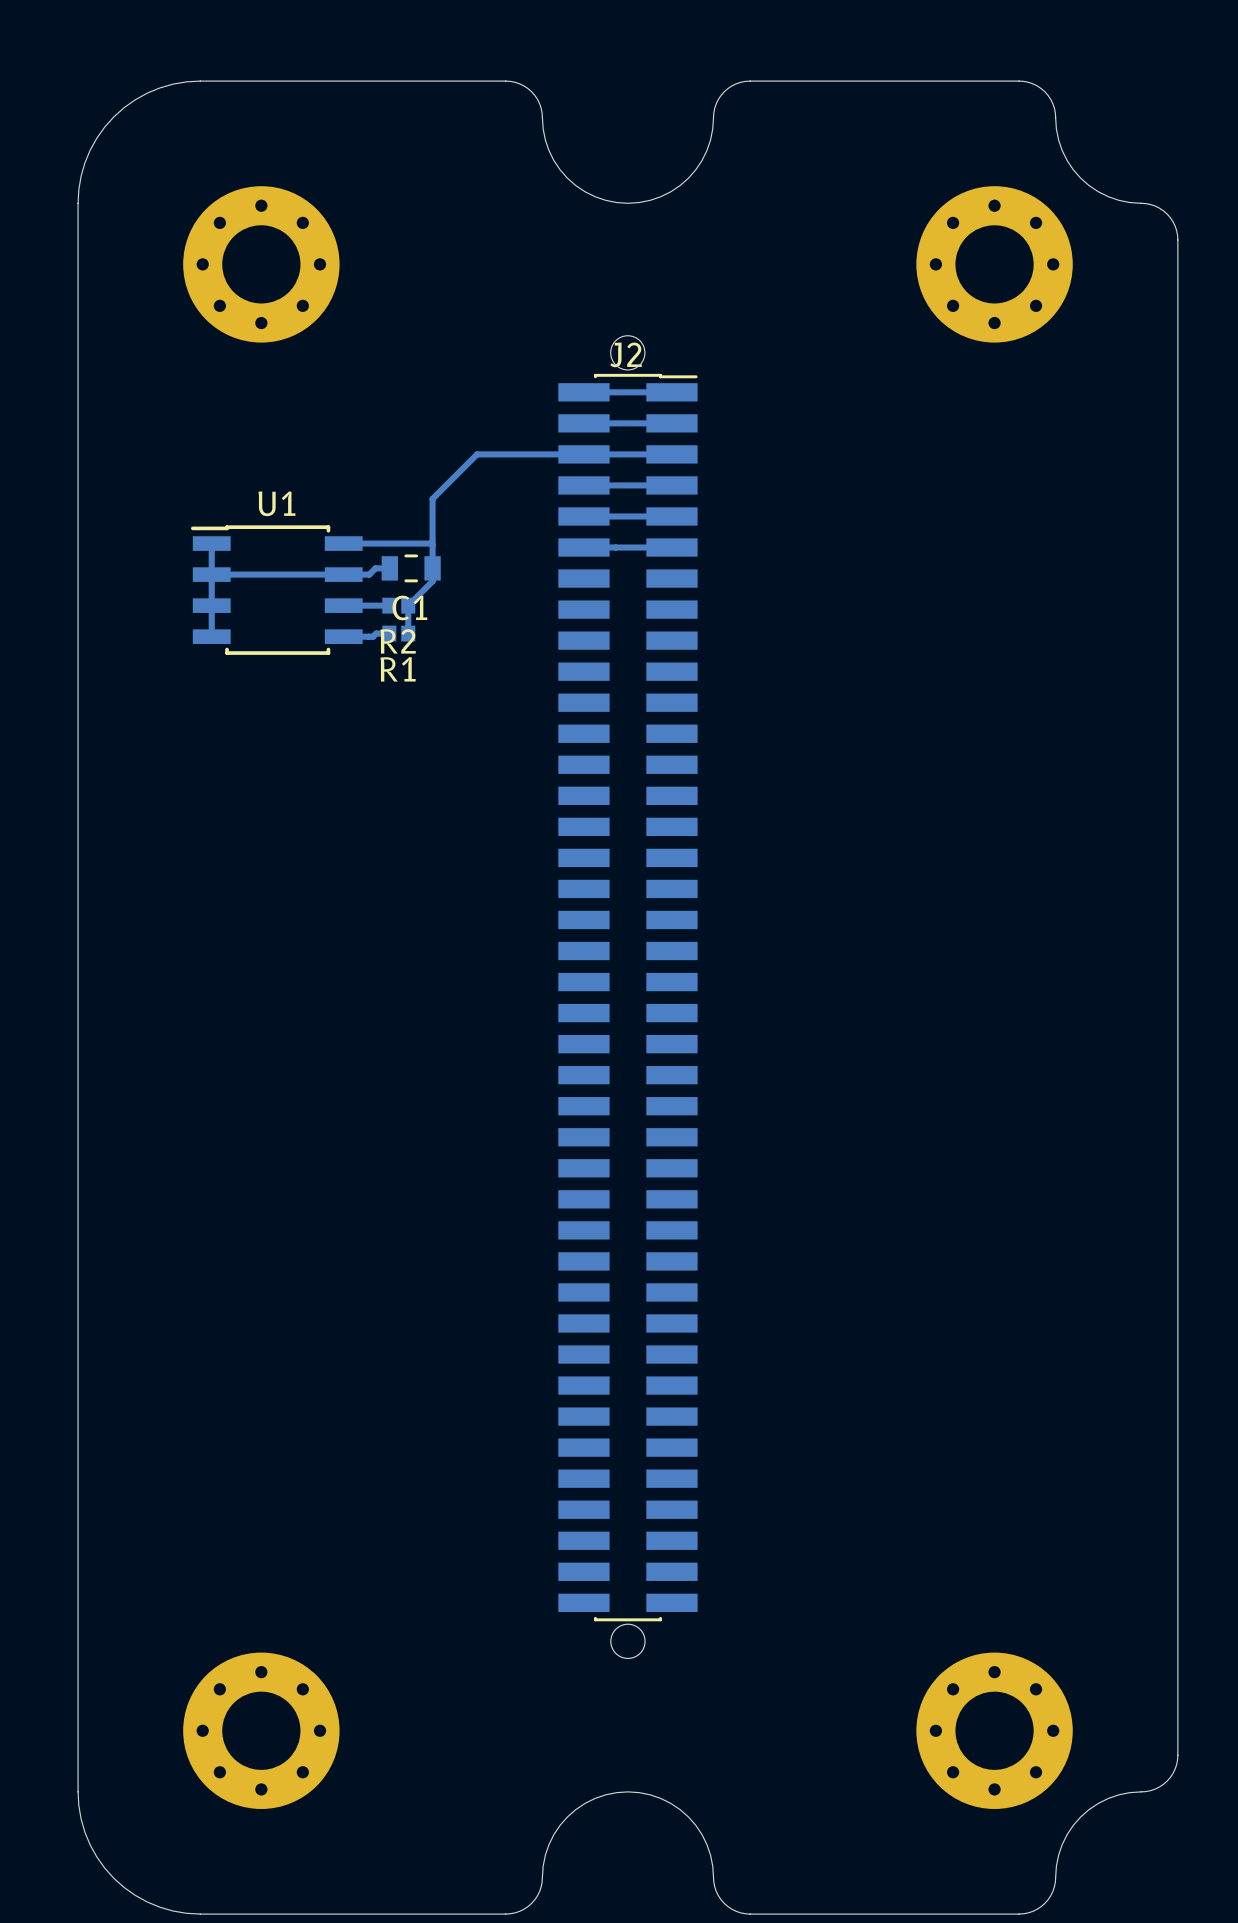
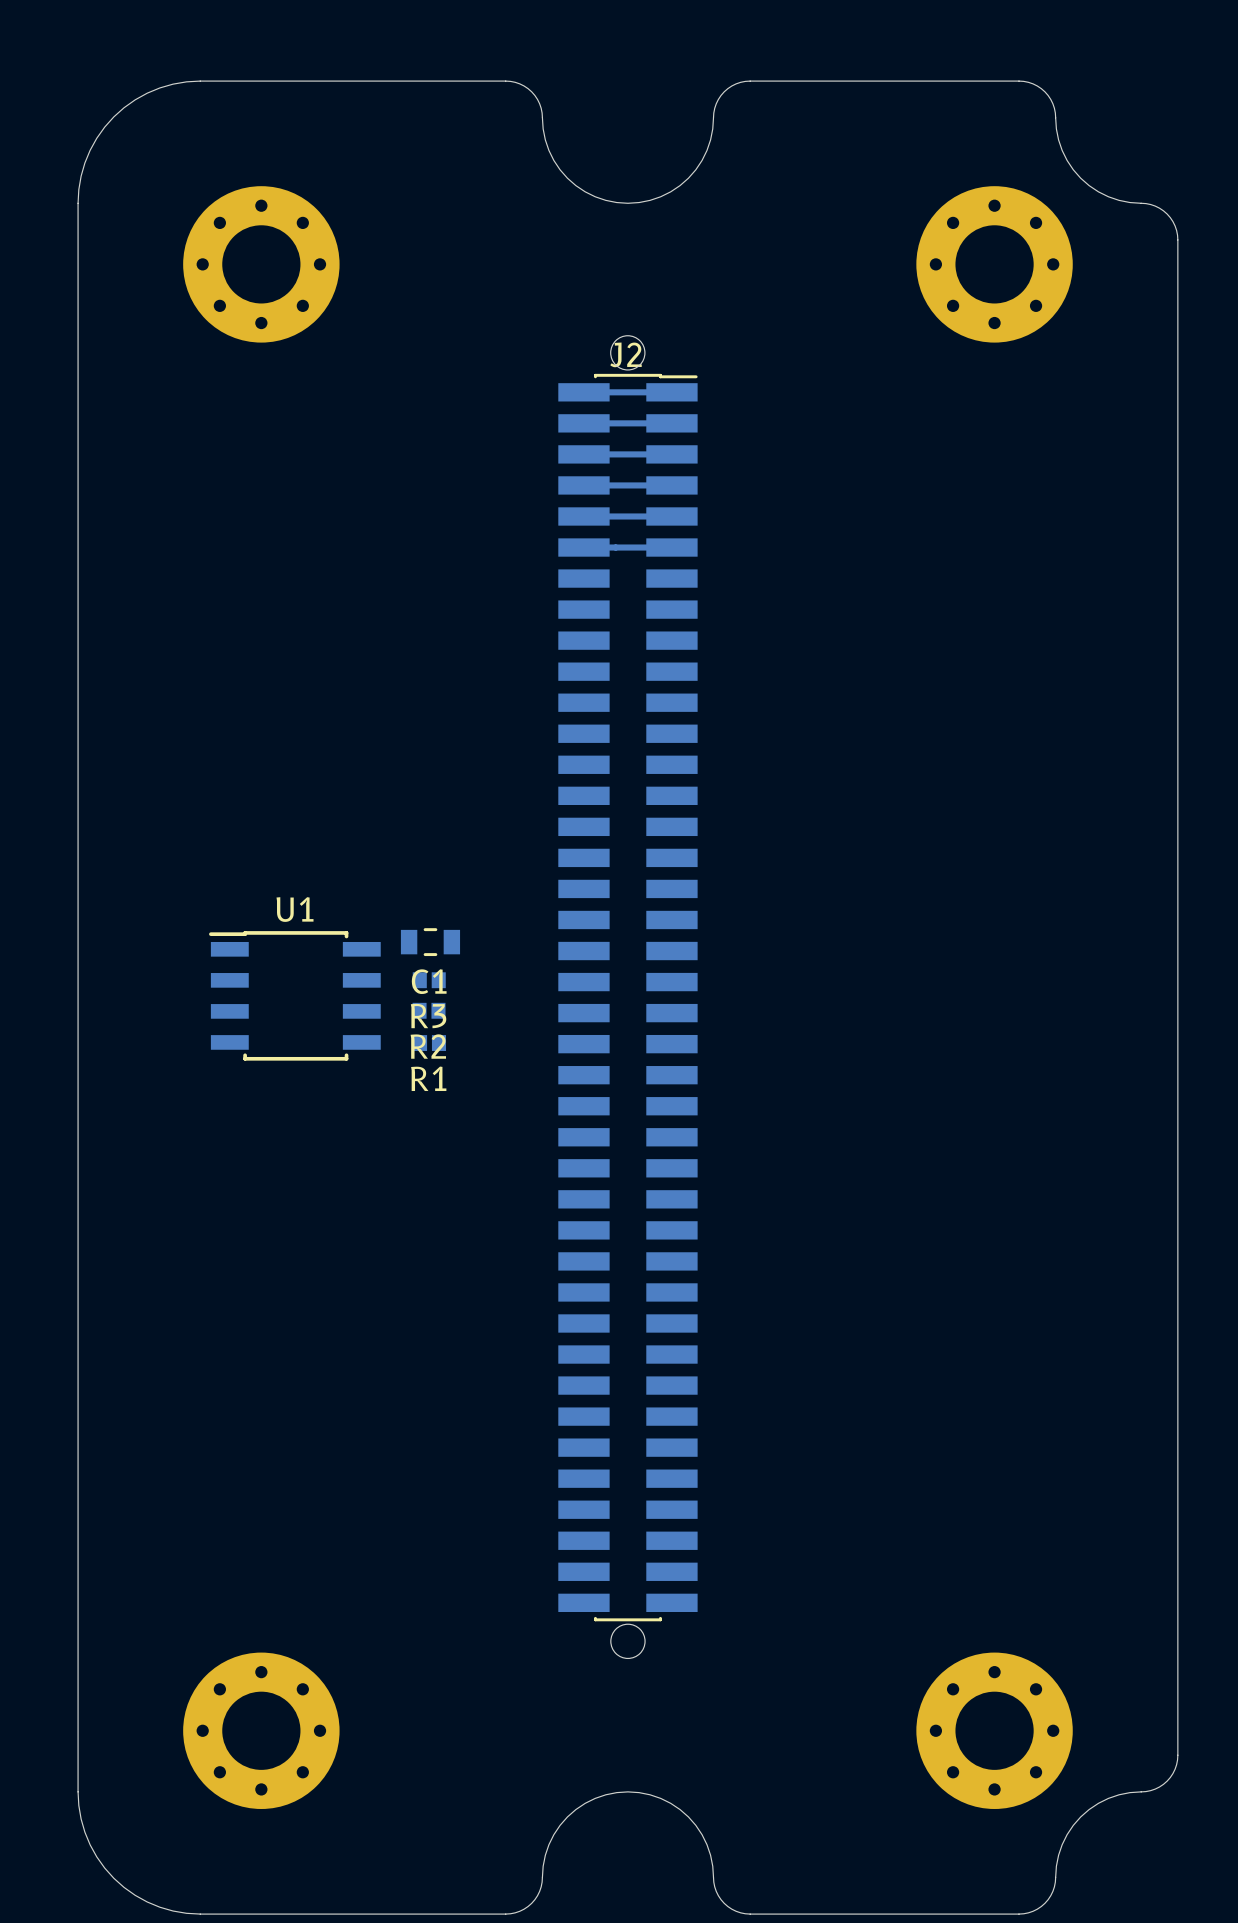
track: (583, 454) (477, 454) (432, 498) (432, 581) (408, 605) (408, 633) -> none
track: (211, 543) (211, 636) -> none
track: (343, 543) (431, 543) (432, 545) -> none
track: (389, 568) (375, 568) (369, 574) (211, 574) -> none
C1 position: (411, 568) -> (430, 942)
U1 position: (276, 590) -> (294, 995)
track: (389, 605) (343, 605) -> none
R2 position: (398, 605) -> (429, 1010)
track: (389, 633) (376, 633) (373, 636) (343, 636) -> none
R1 position: (398, 633) -> (429, 1043)
R3: none -> (429, 980)

